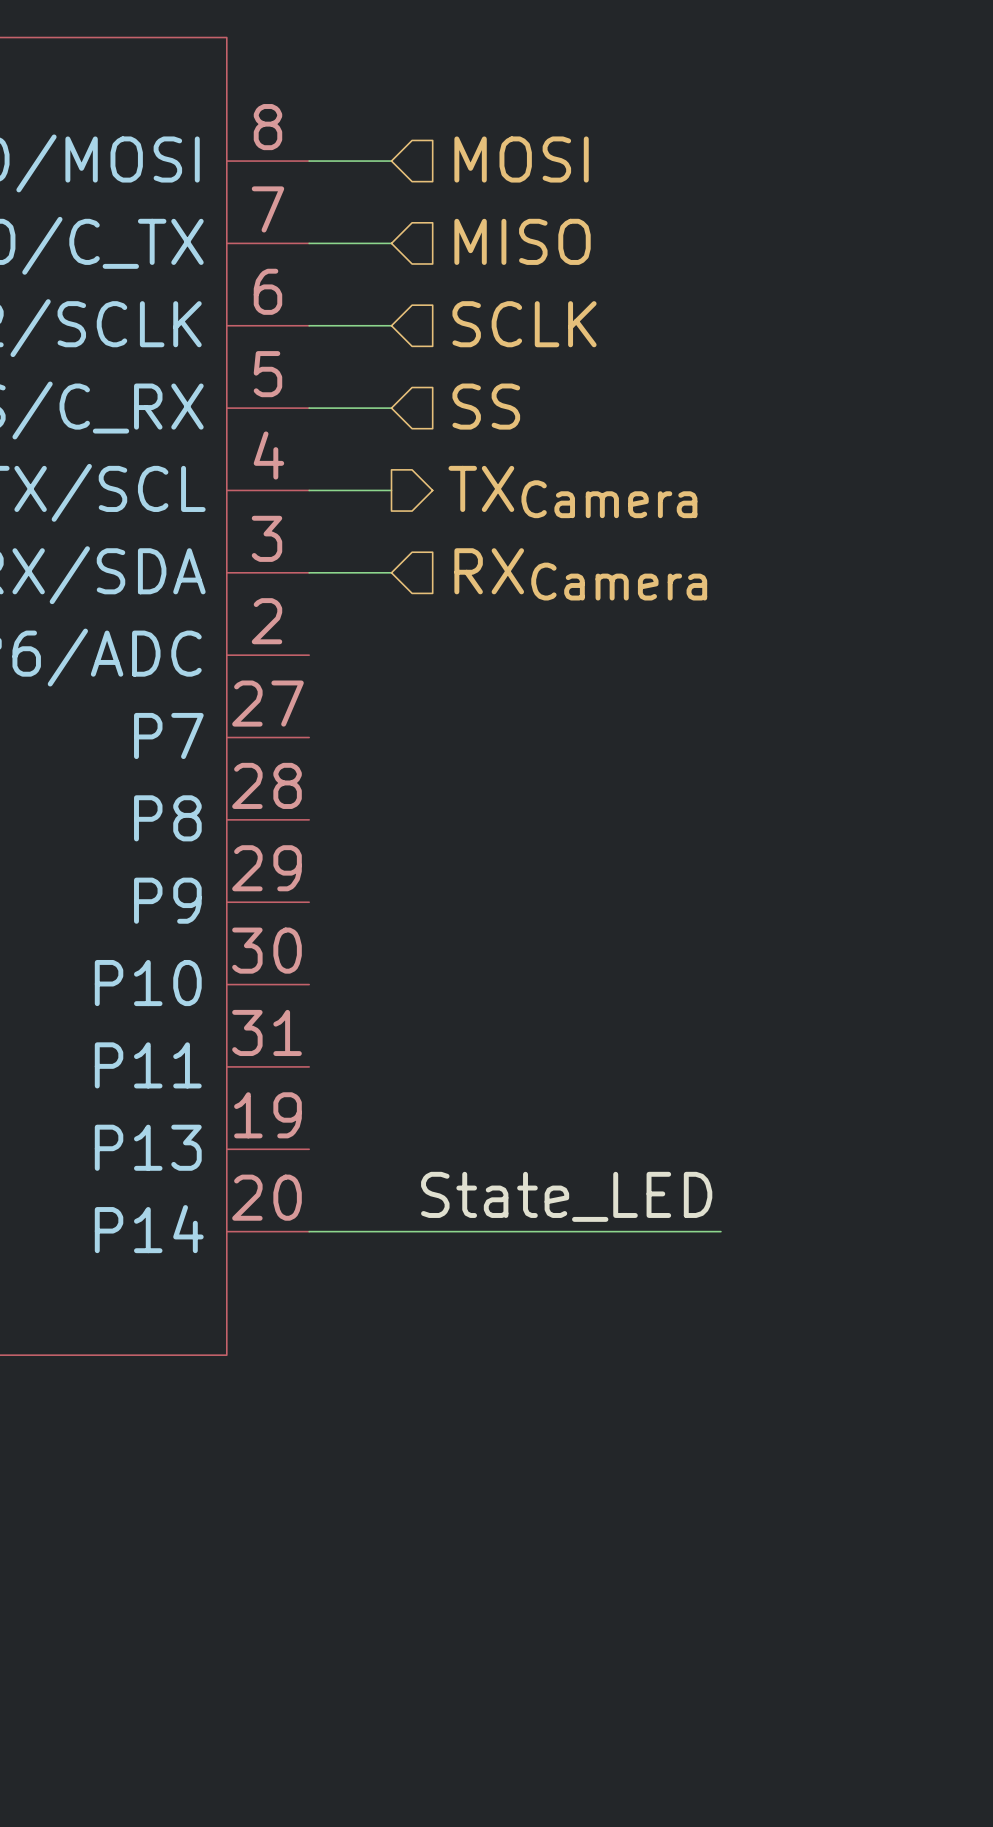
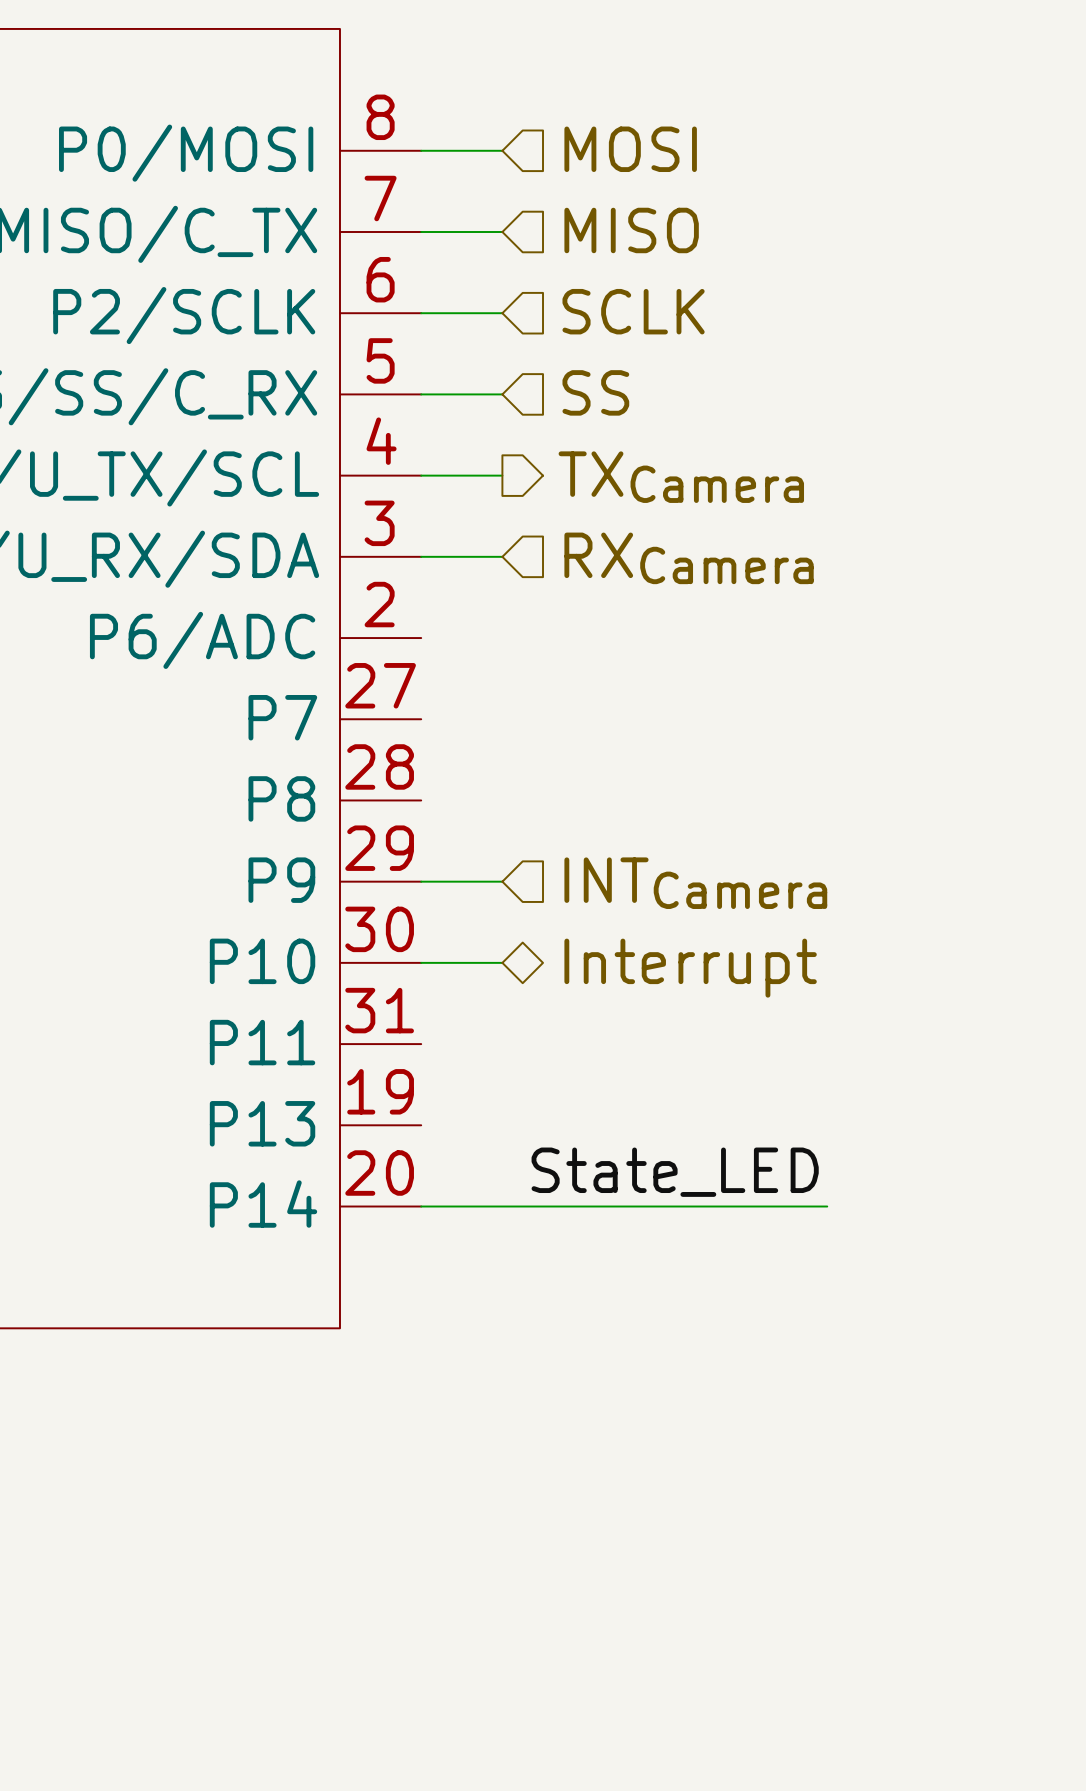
wire: none -> (421, 881) (502, 881)
hierarchical label: none -> INTCamera (695, 883)
wire: none -> (421, 962) (502, 962)
hierarchical label: none -> Interrupt (690, 968)

